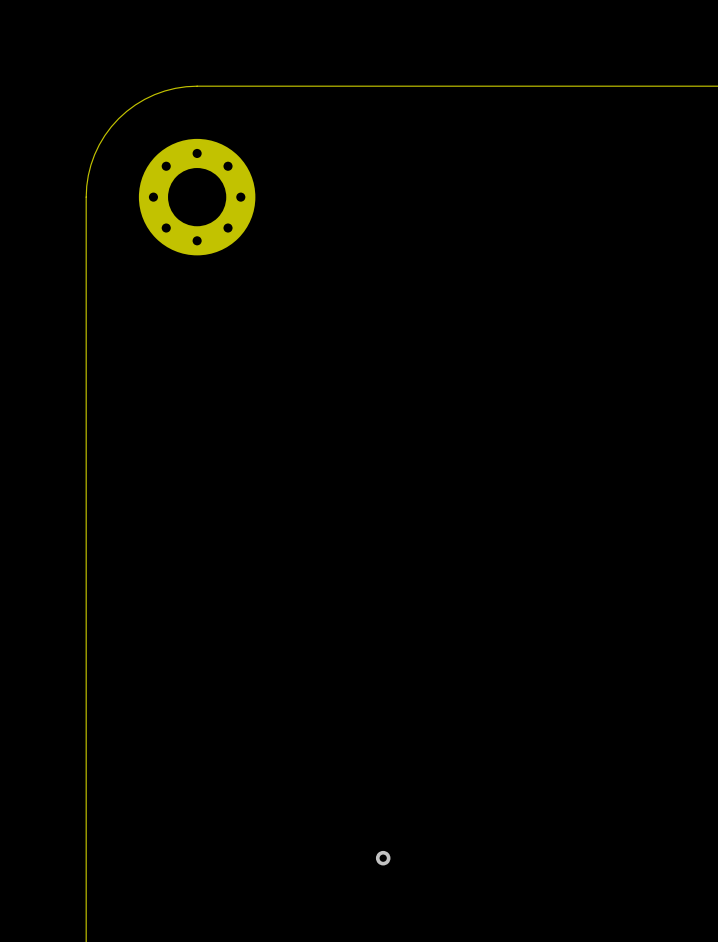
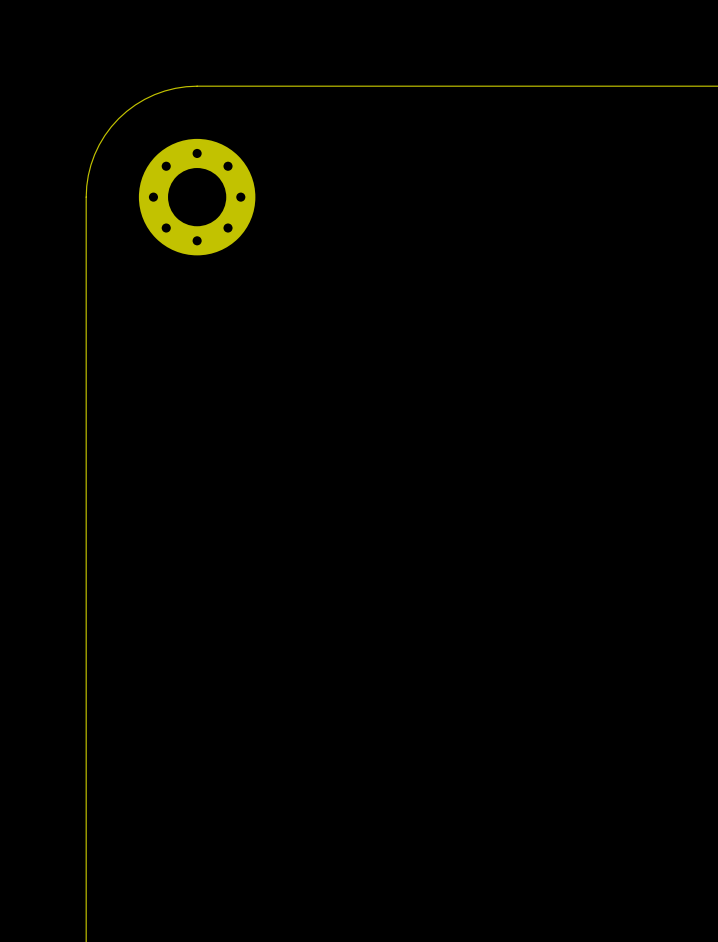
via: (383, 858) -> none

